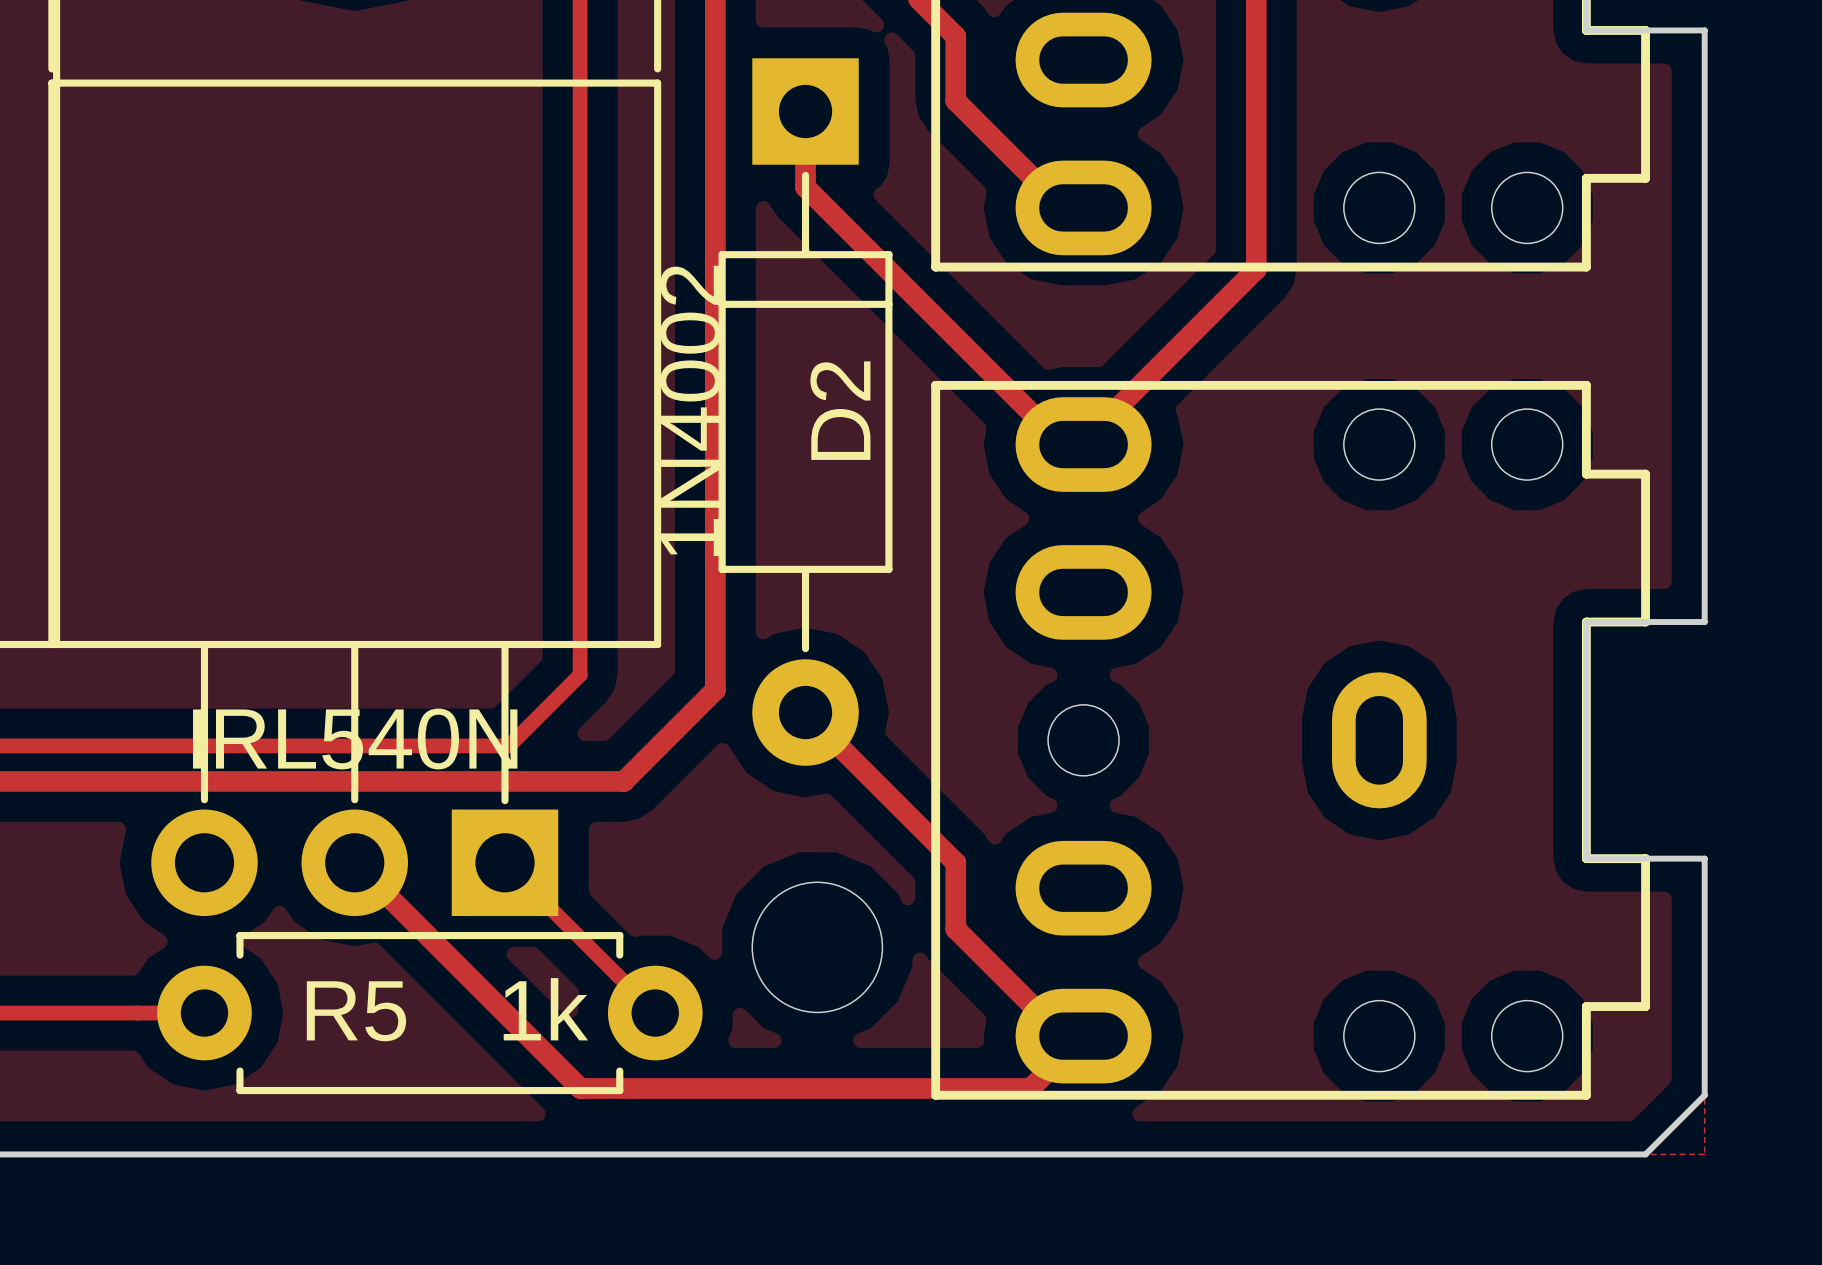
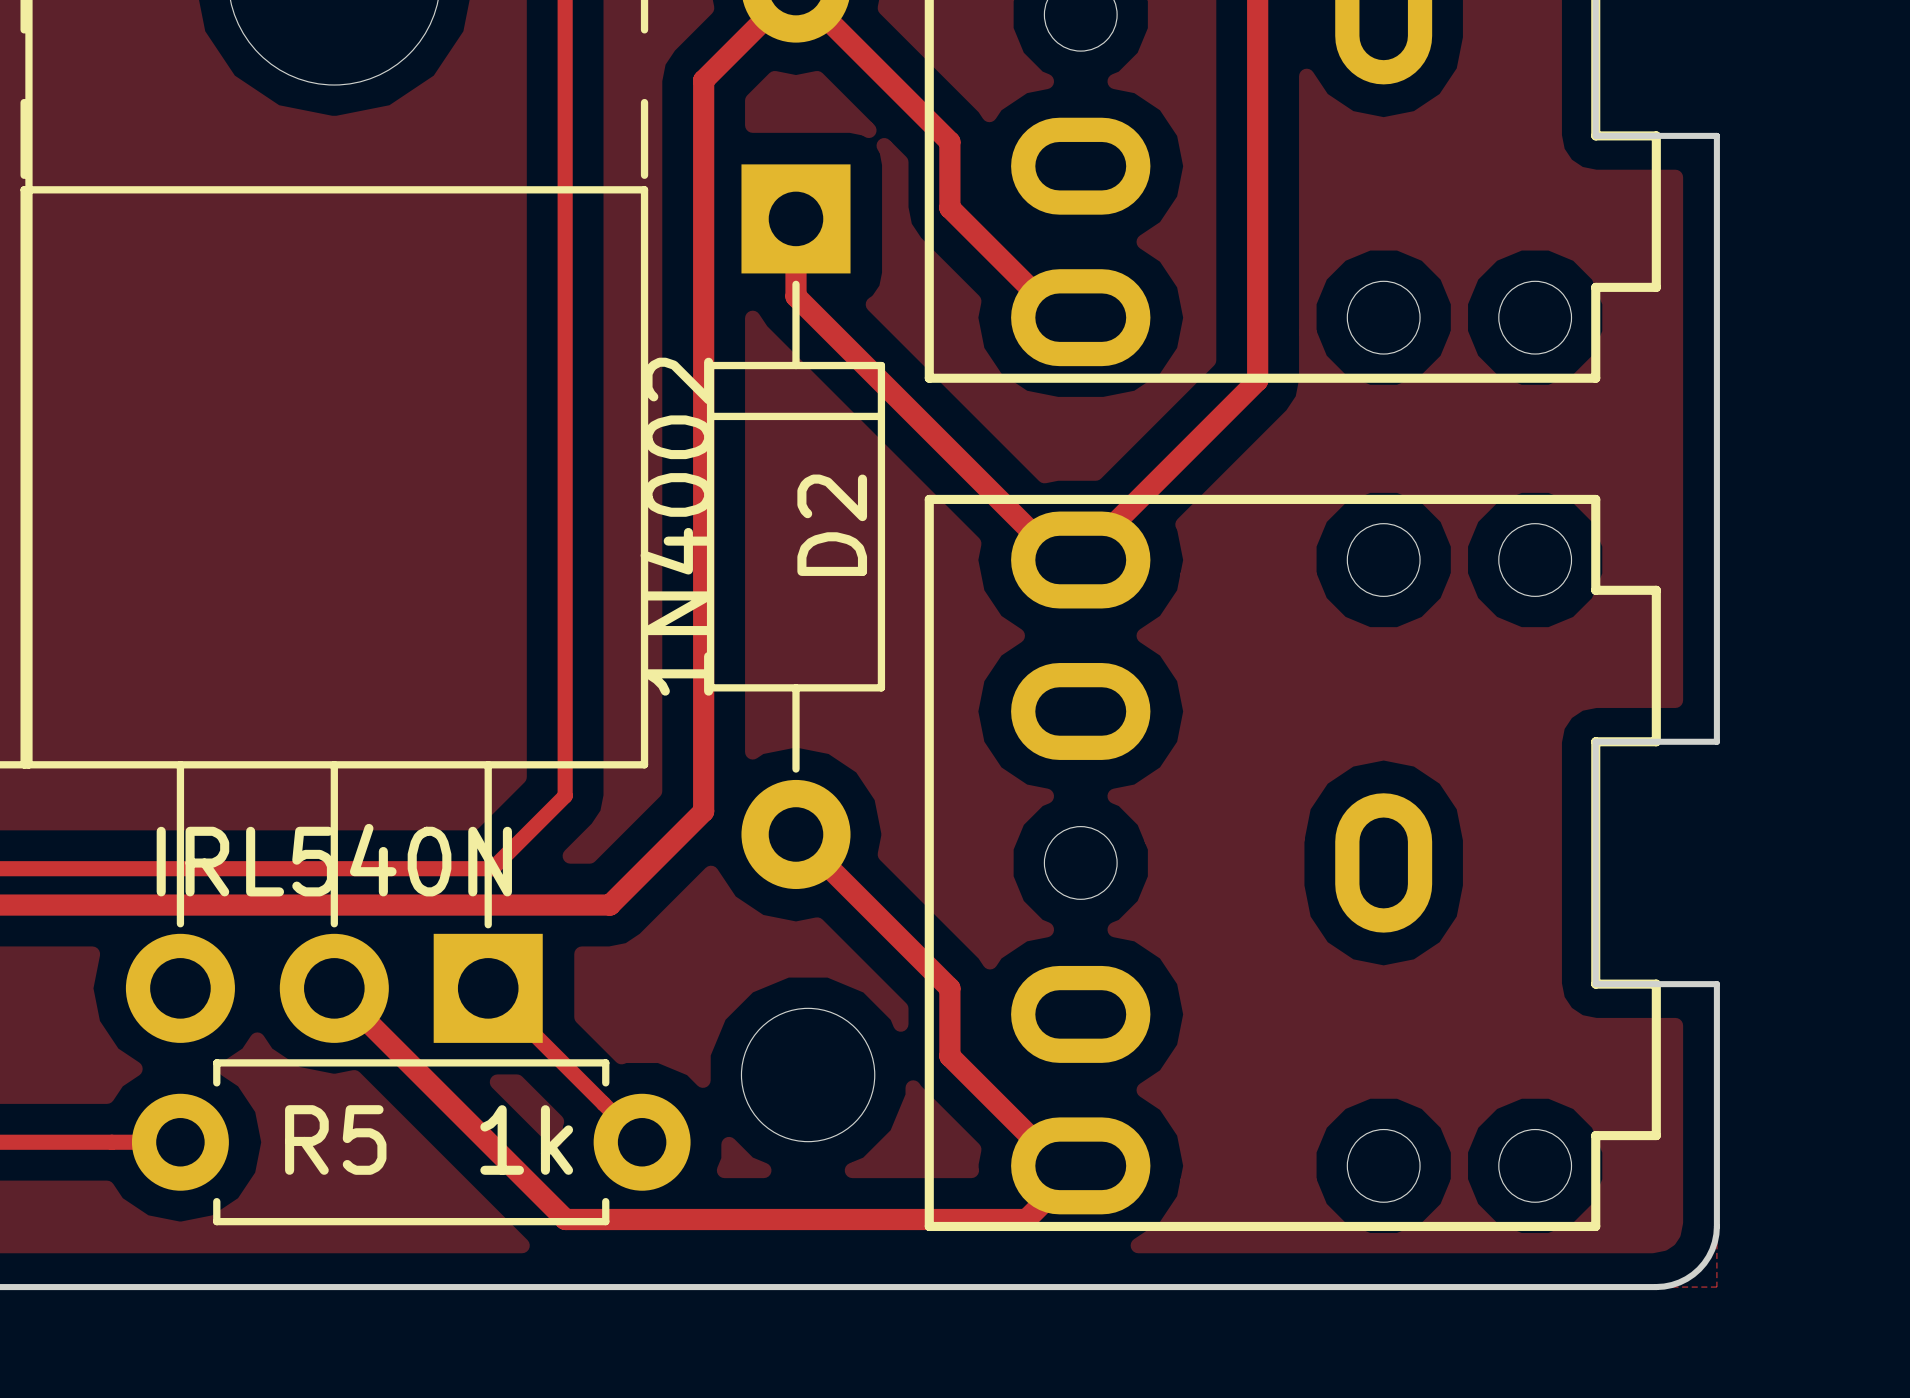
board edge: (1704, 1095) (1645, 1154) -> (1716, 1226) (1712, 1249) (1699, 1269) (1679, 1282) (1656, 1287)

